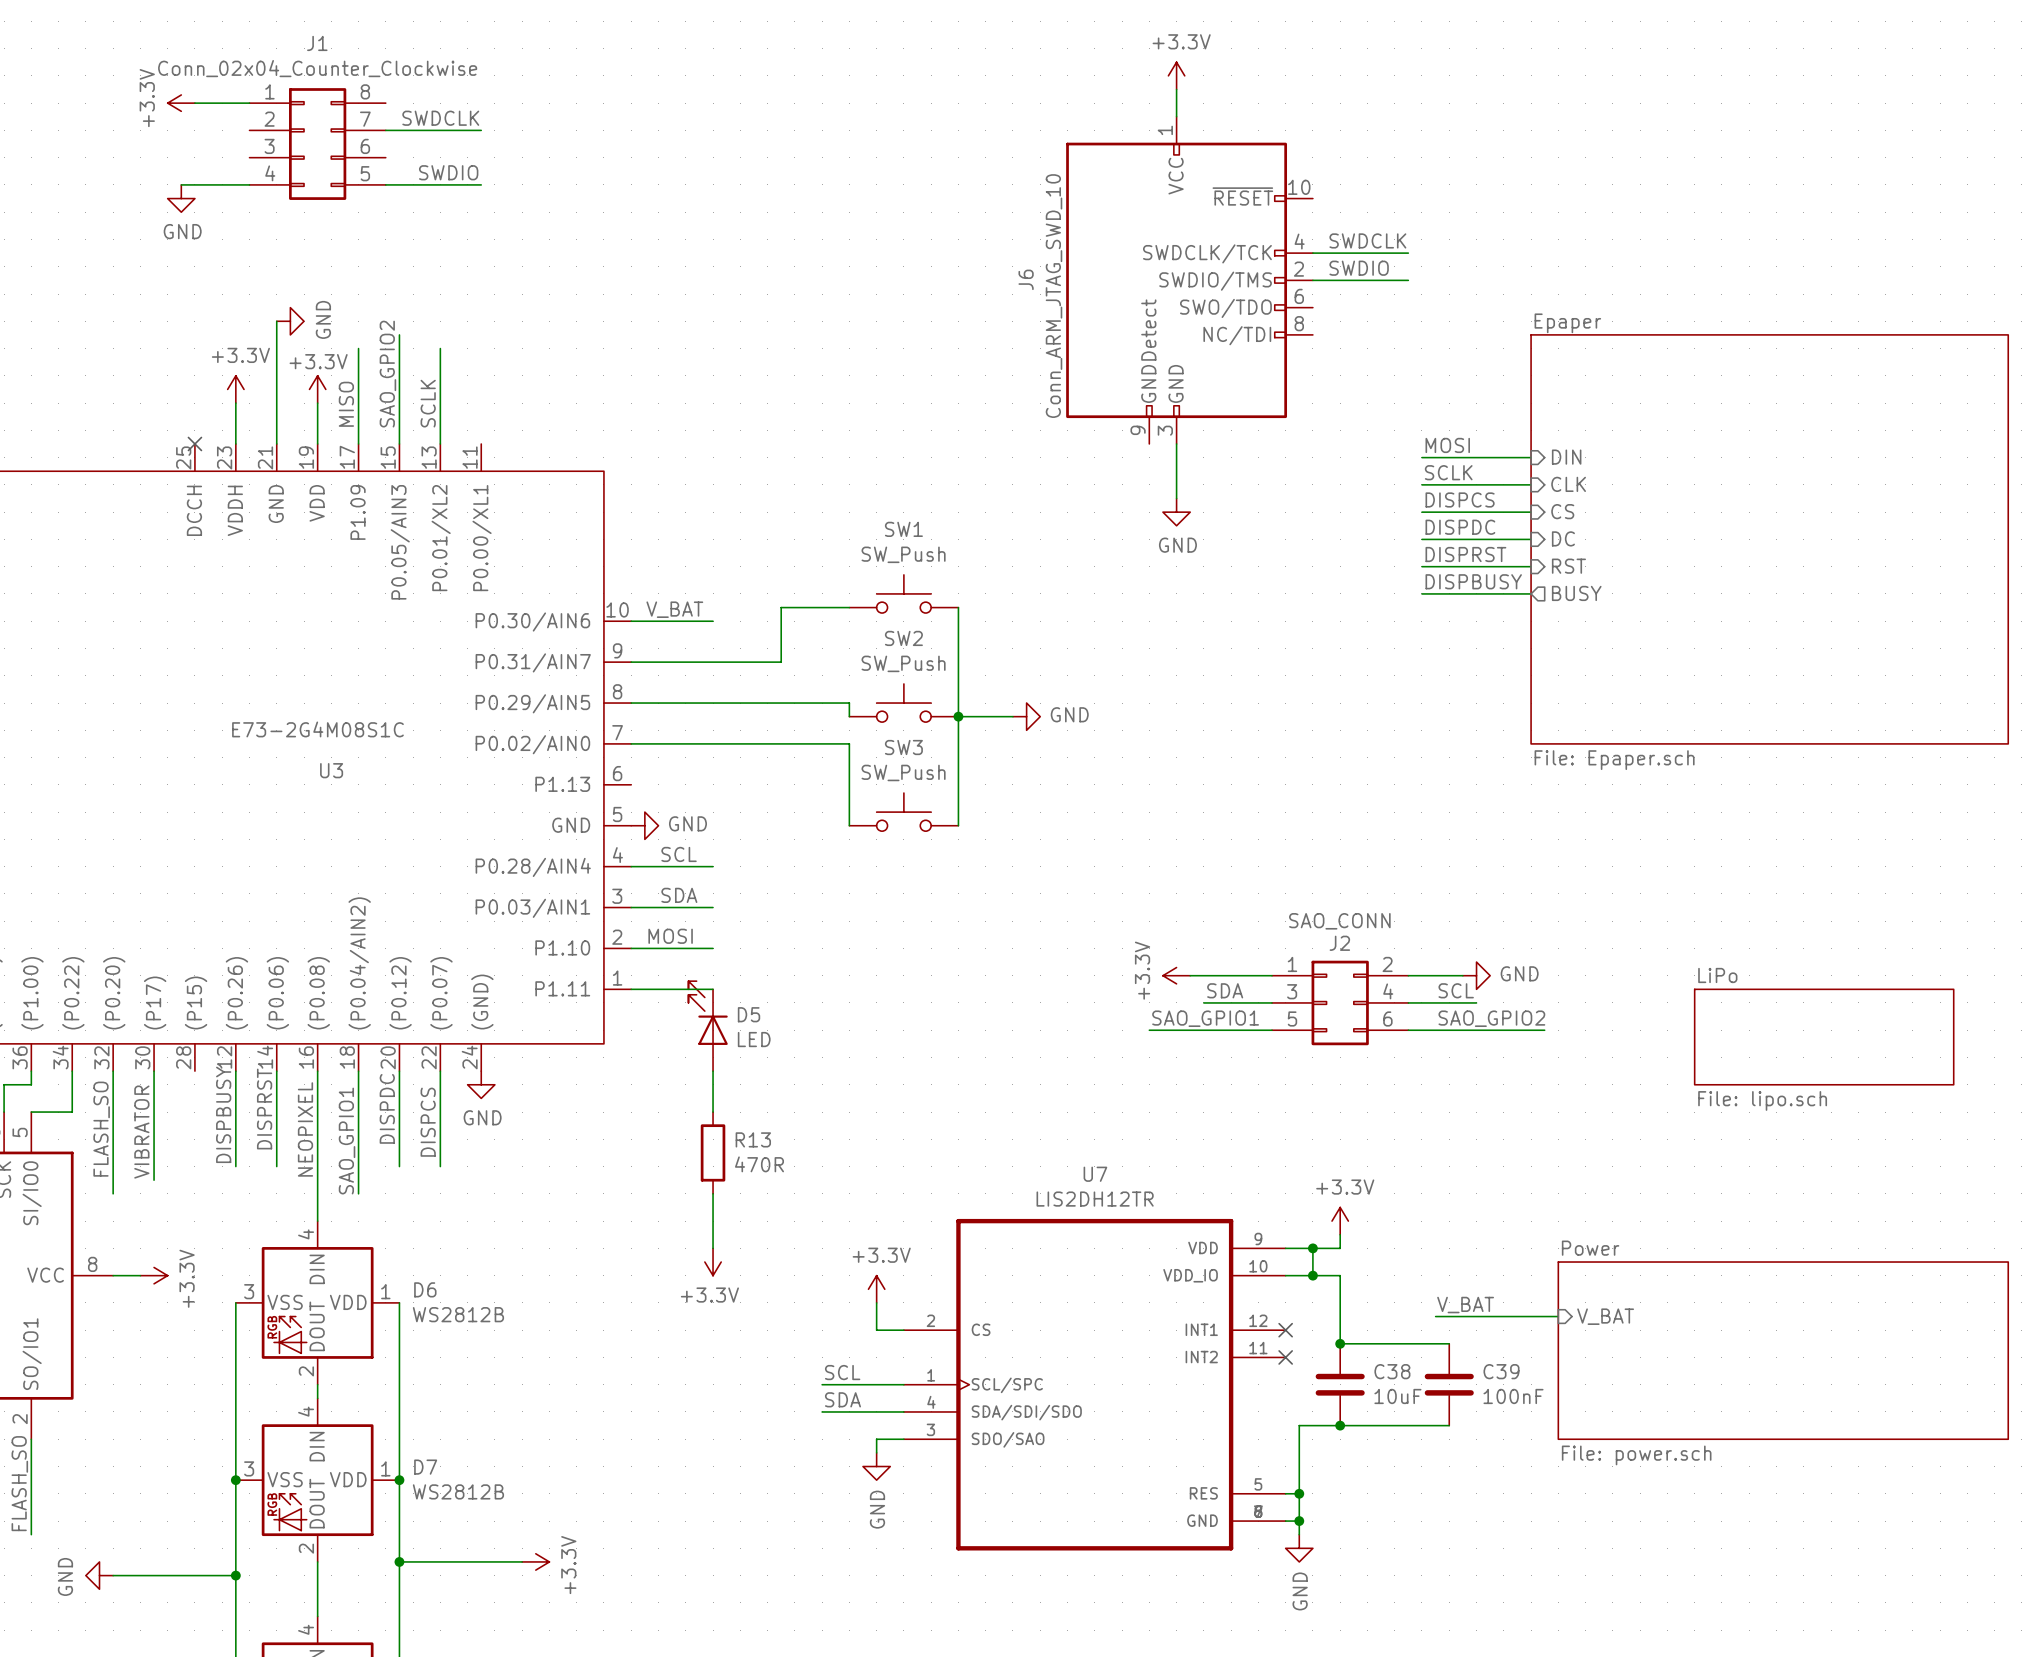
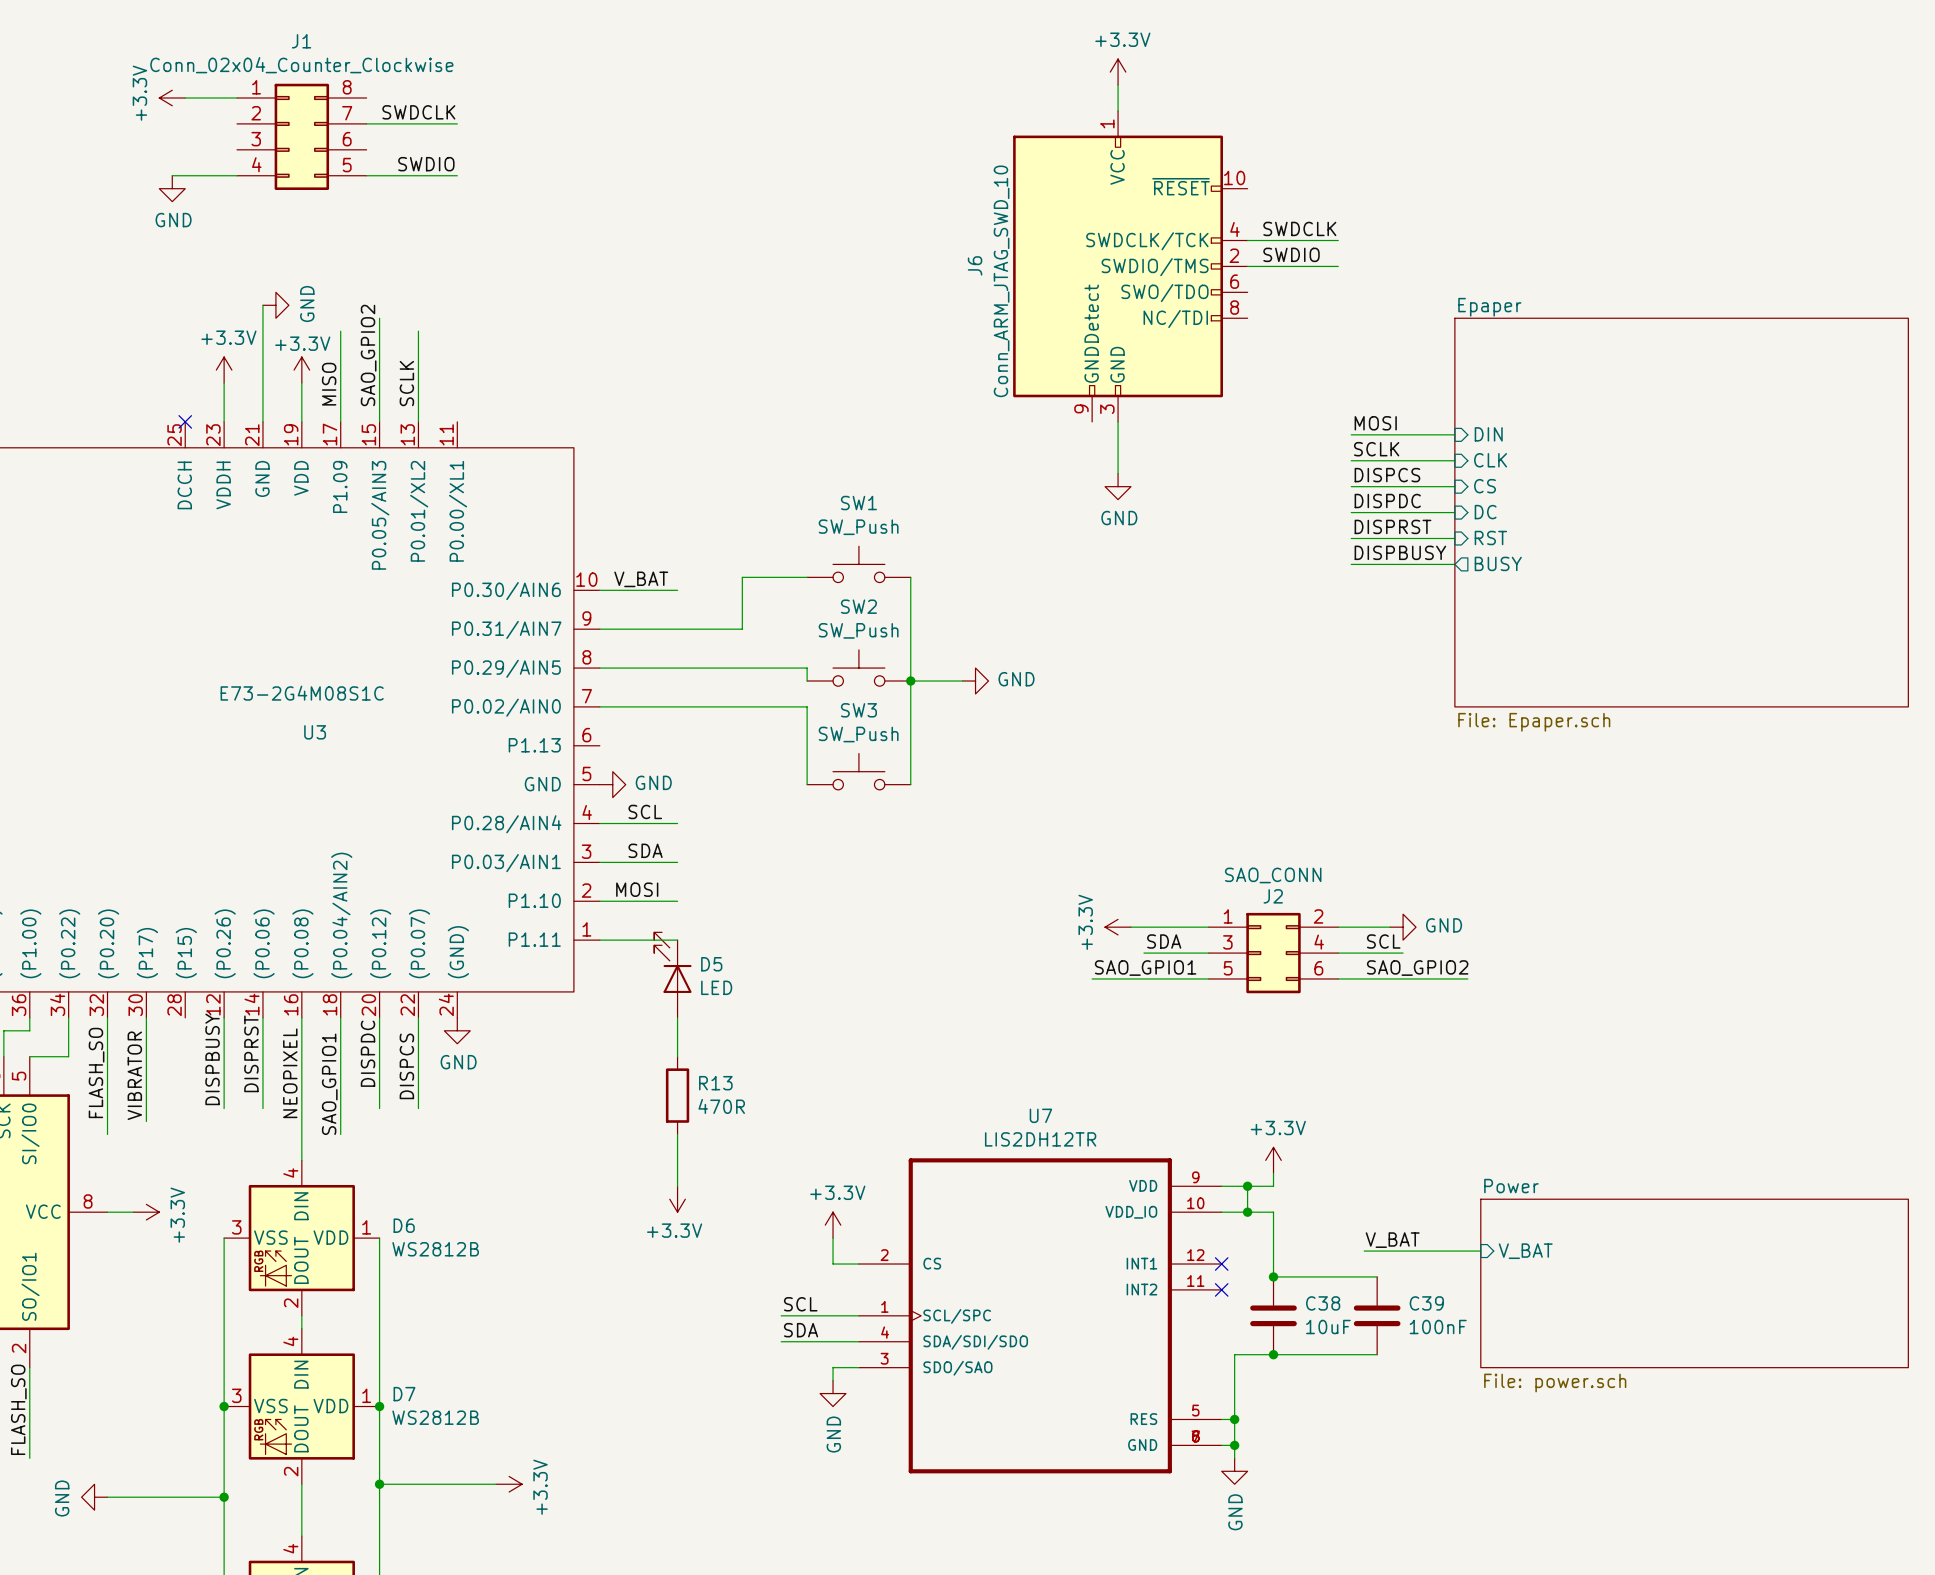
sheet LiPo: File: lipo.sch (1824, 1037) -> none

